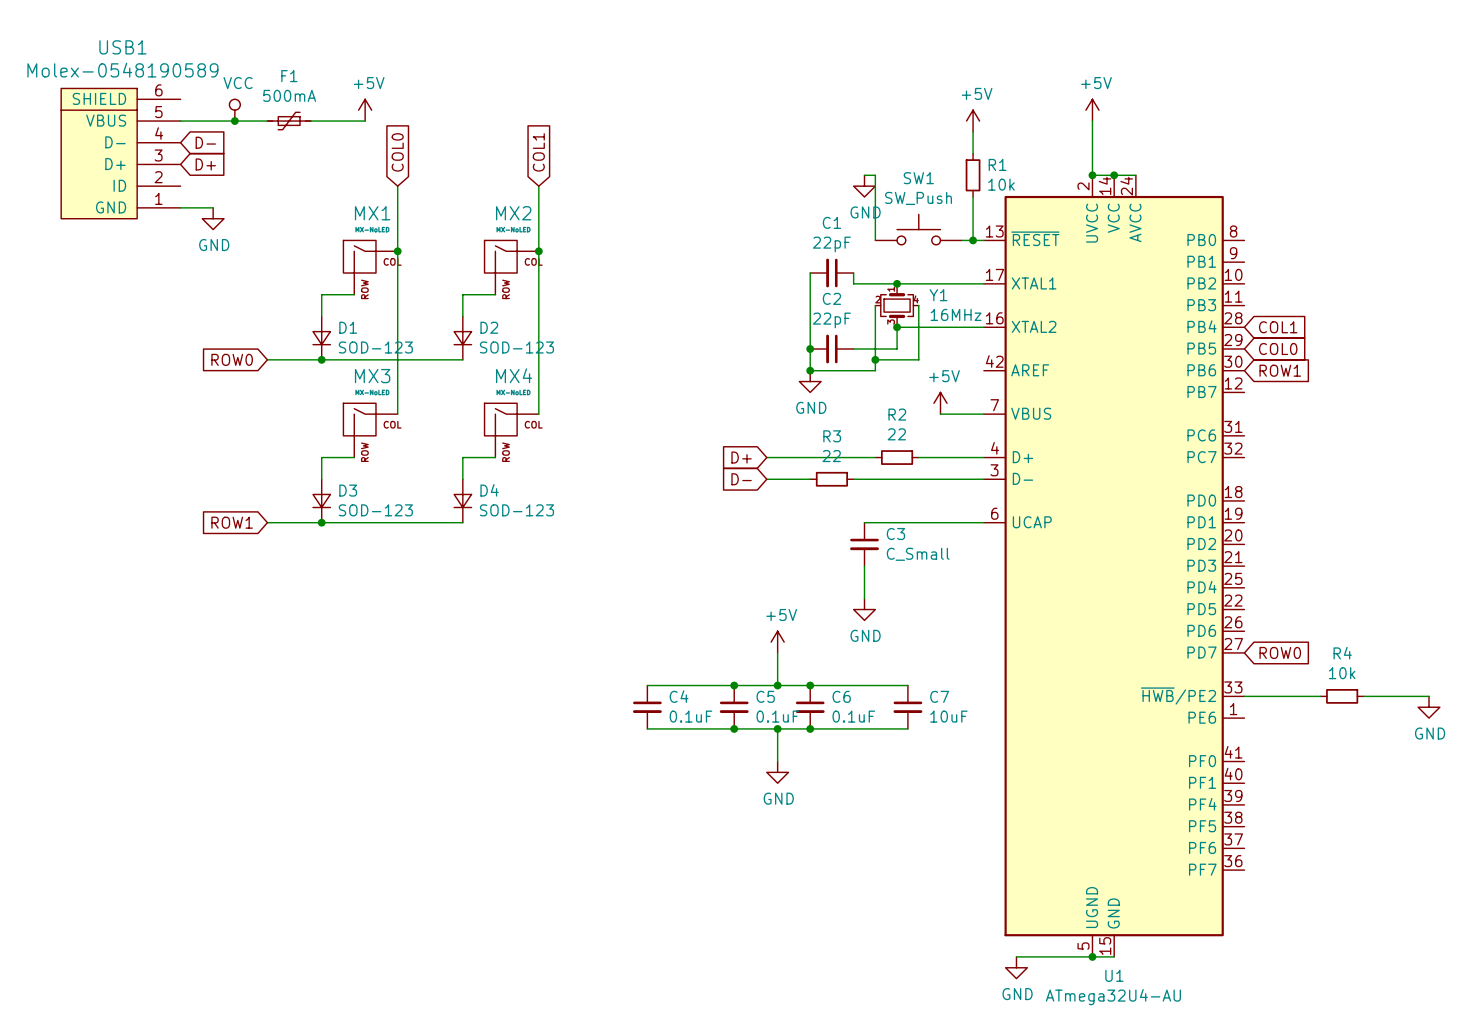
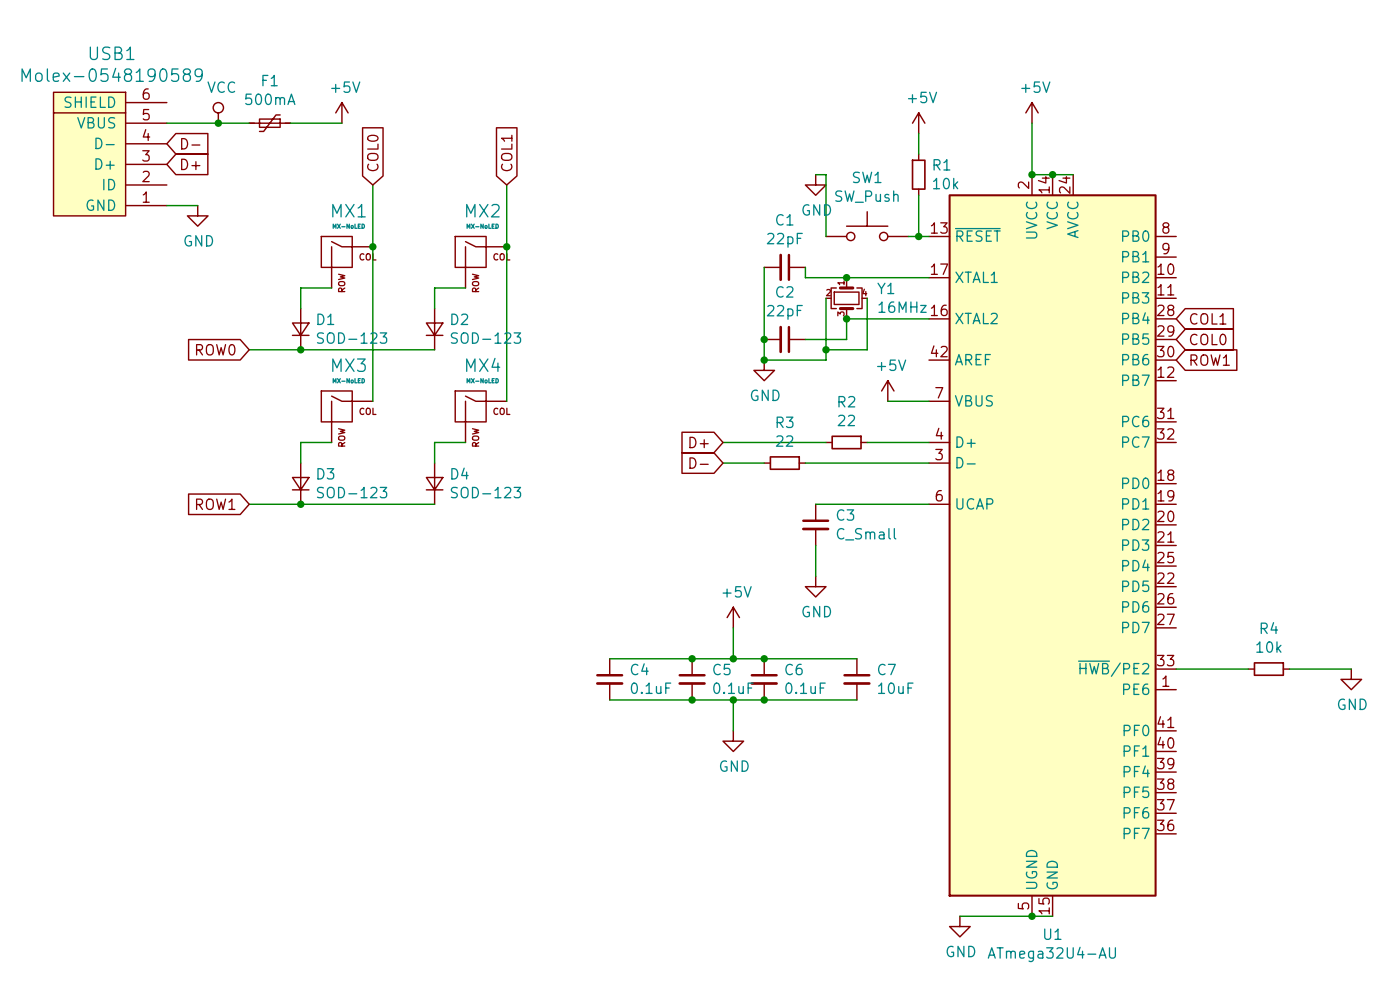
global label: ROW0 (1280, 652) -> none

